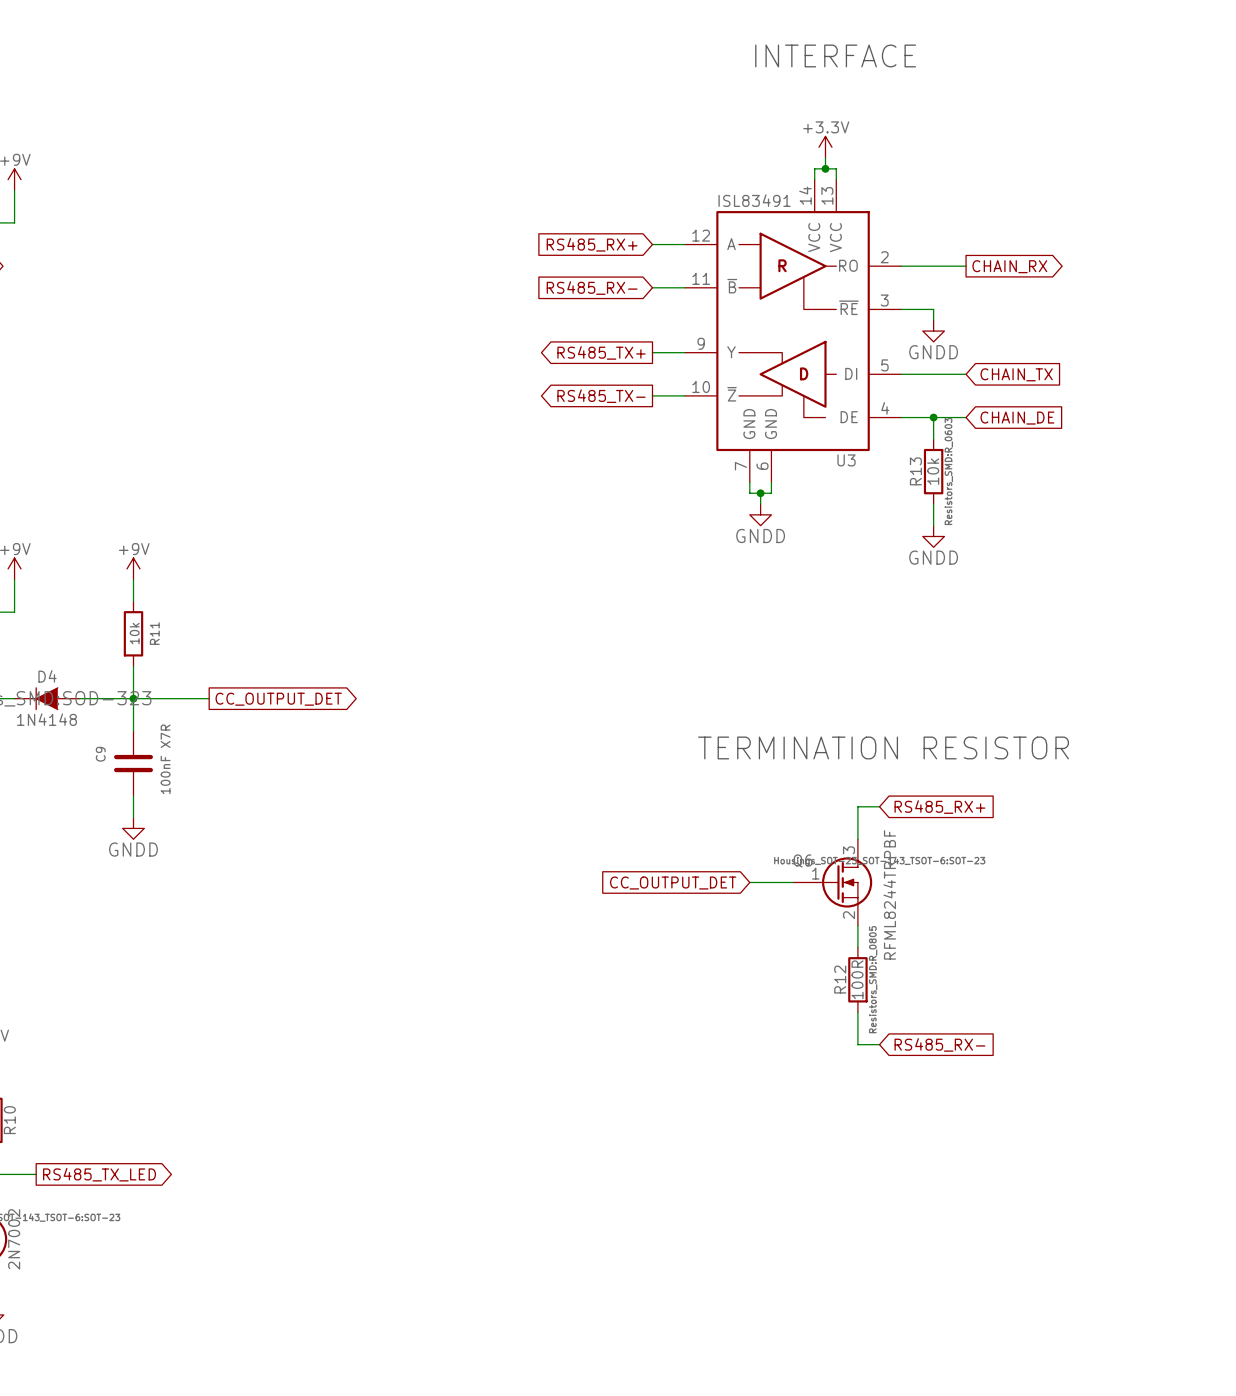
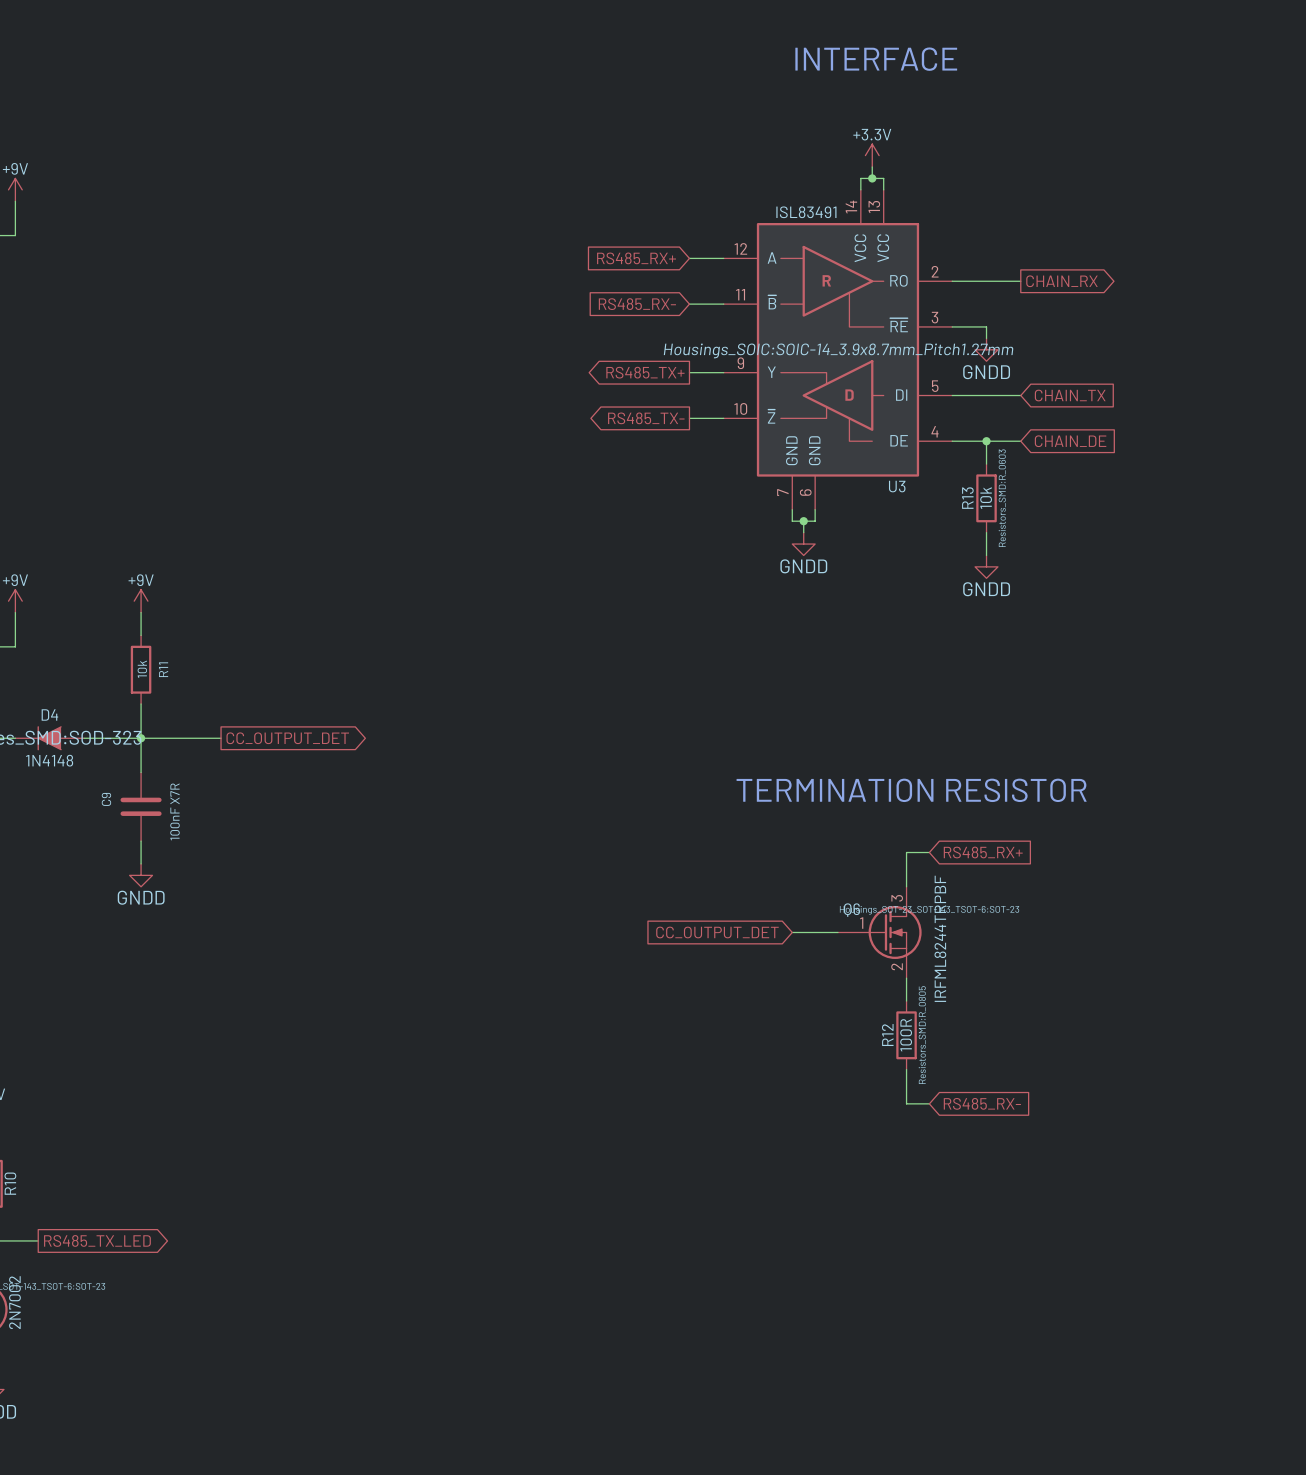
U3 text: none -> Housings_SOIC:SOIC-14_3.9x8.7mm_Pitch1.27mm (838, 350)
Q6 value: RFML8244TRPBF (889, 894) -> IRFML8244TRPBF (940, 938)

